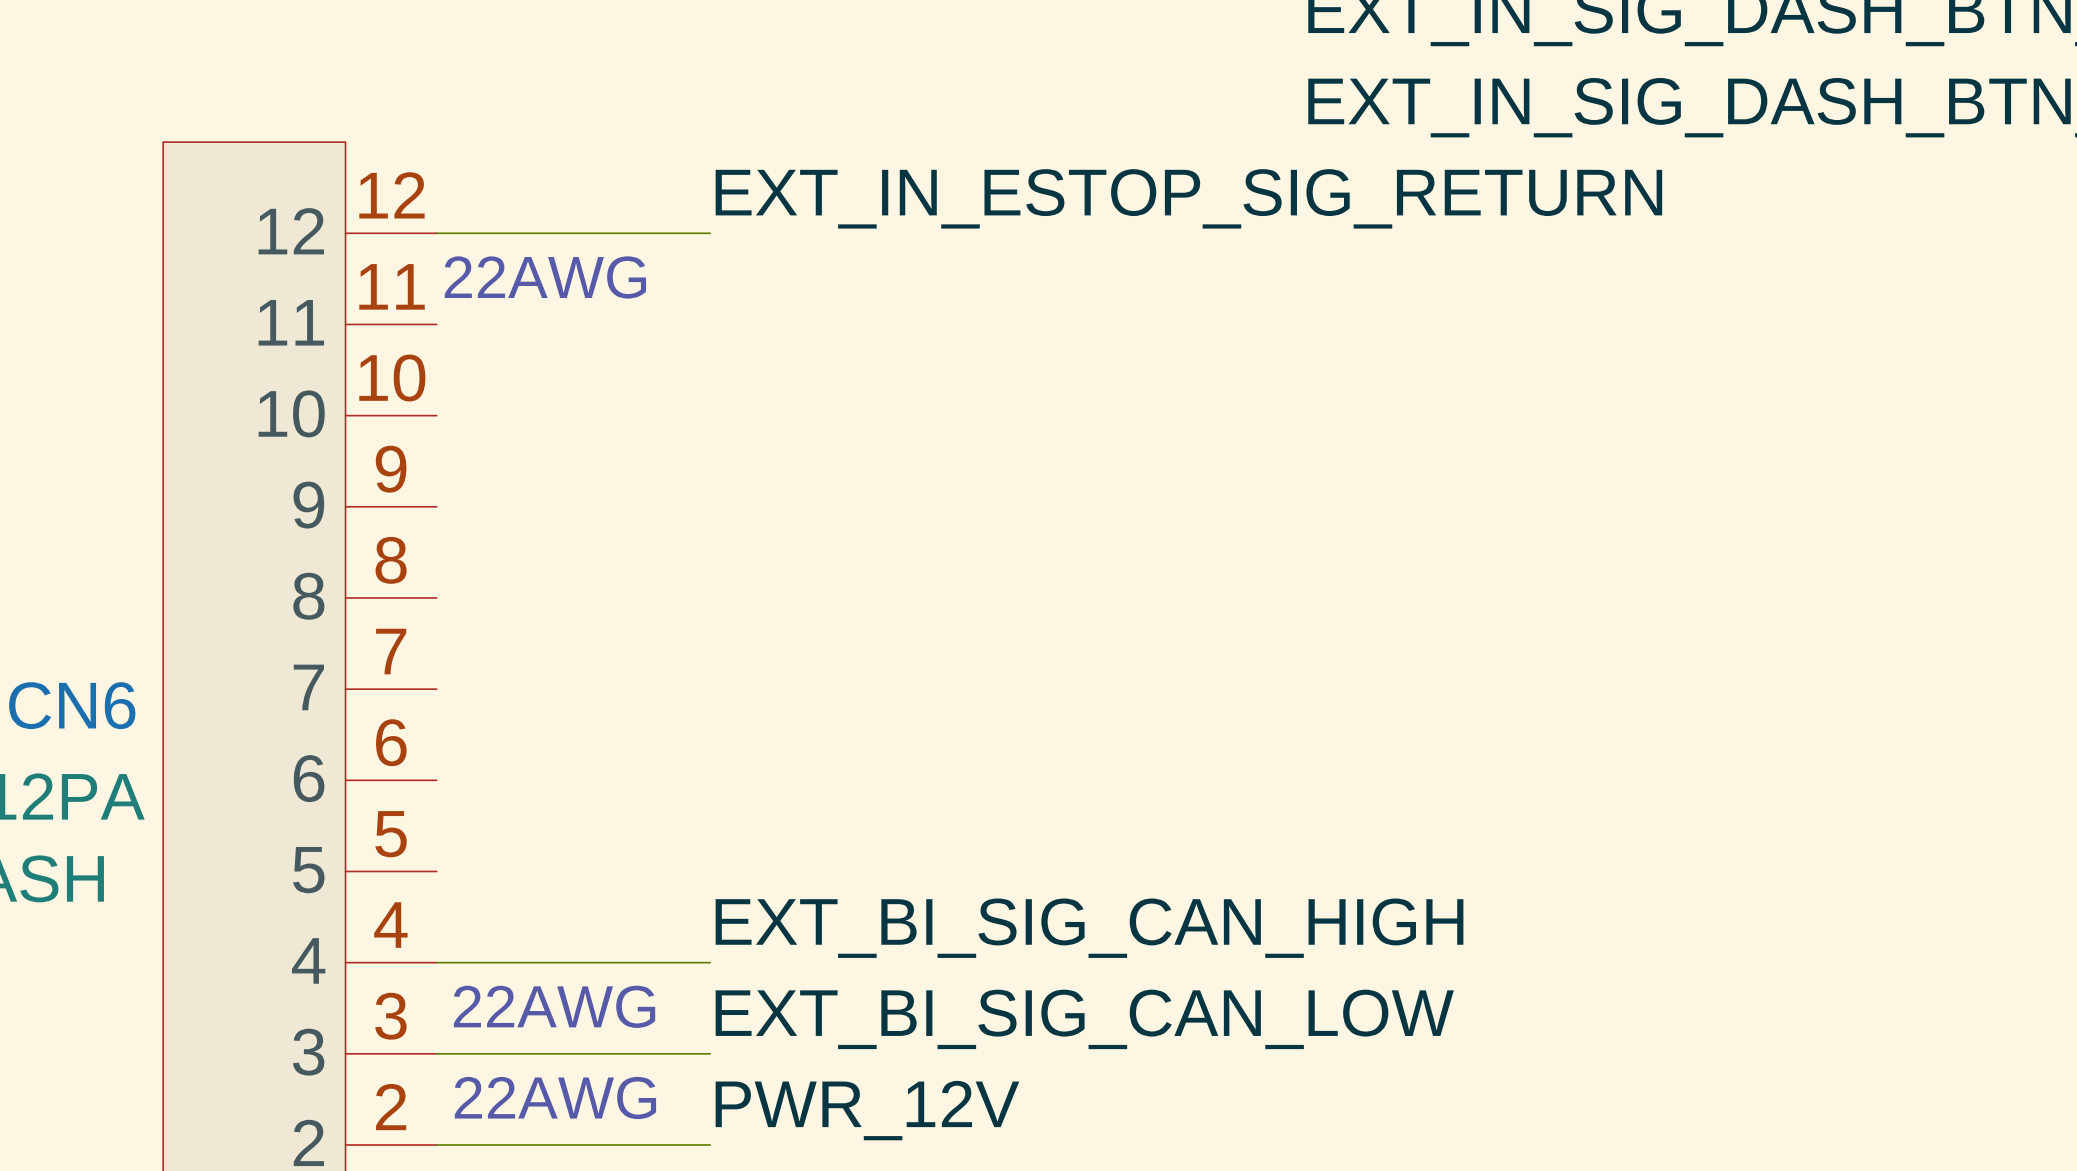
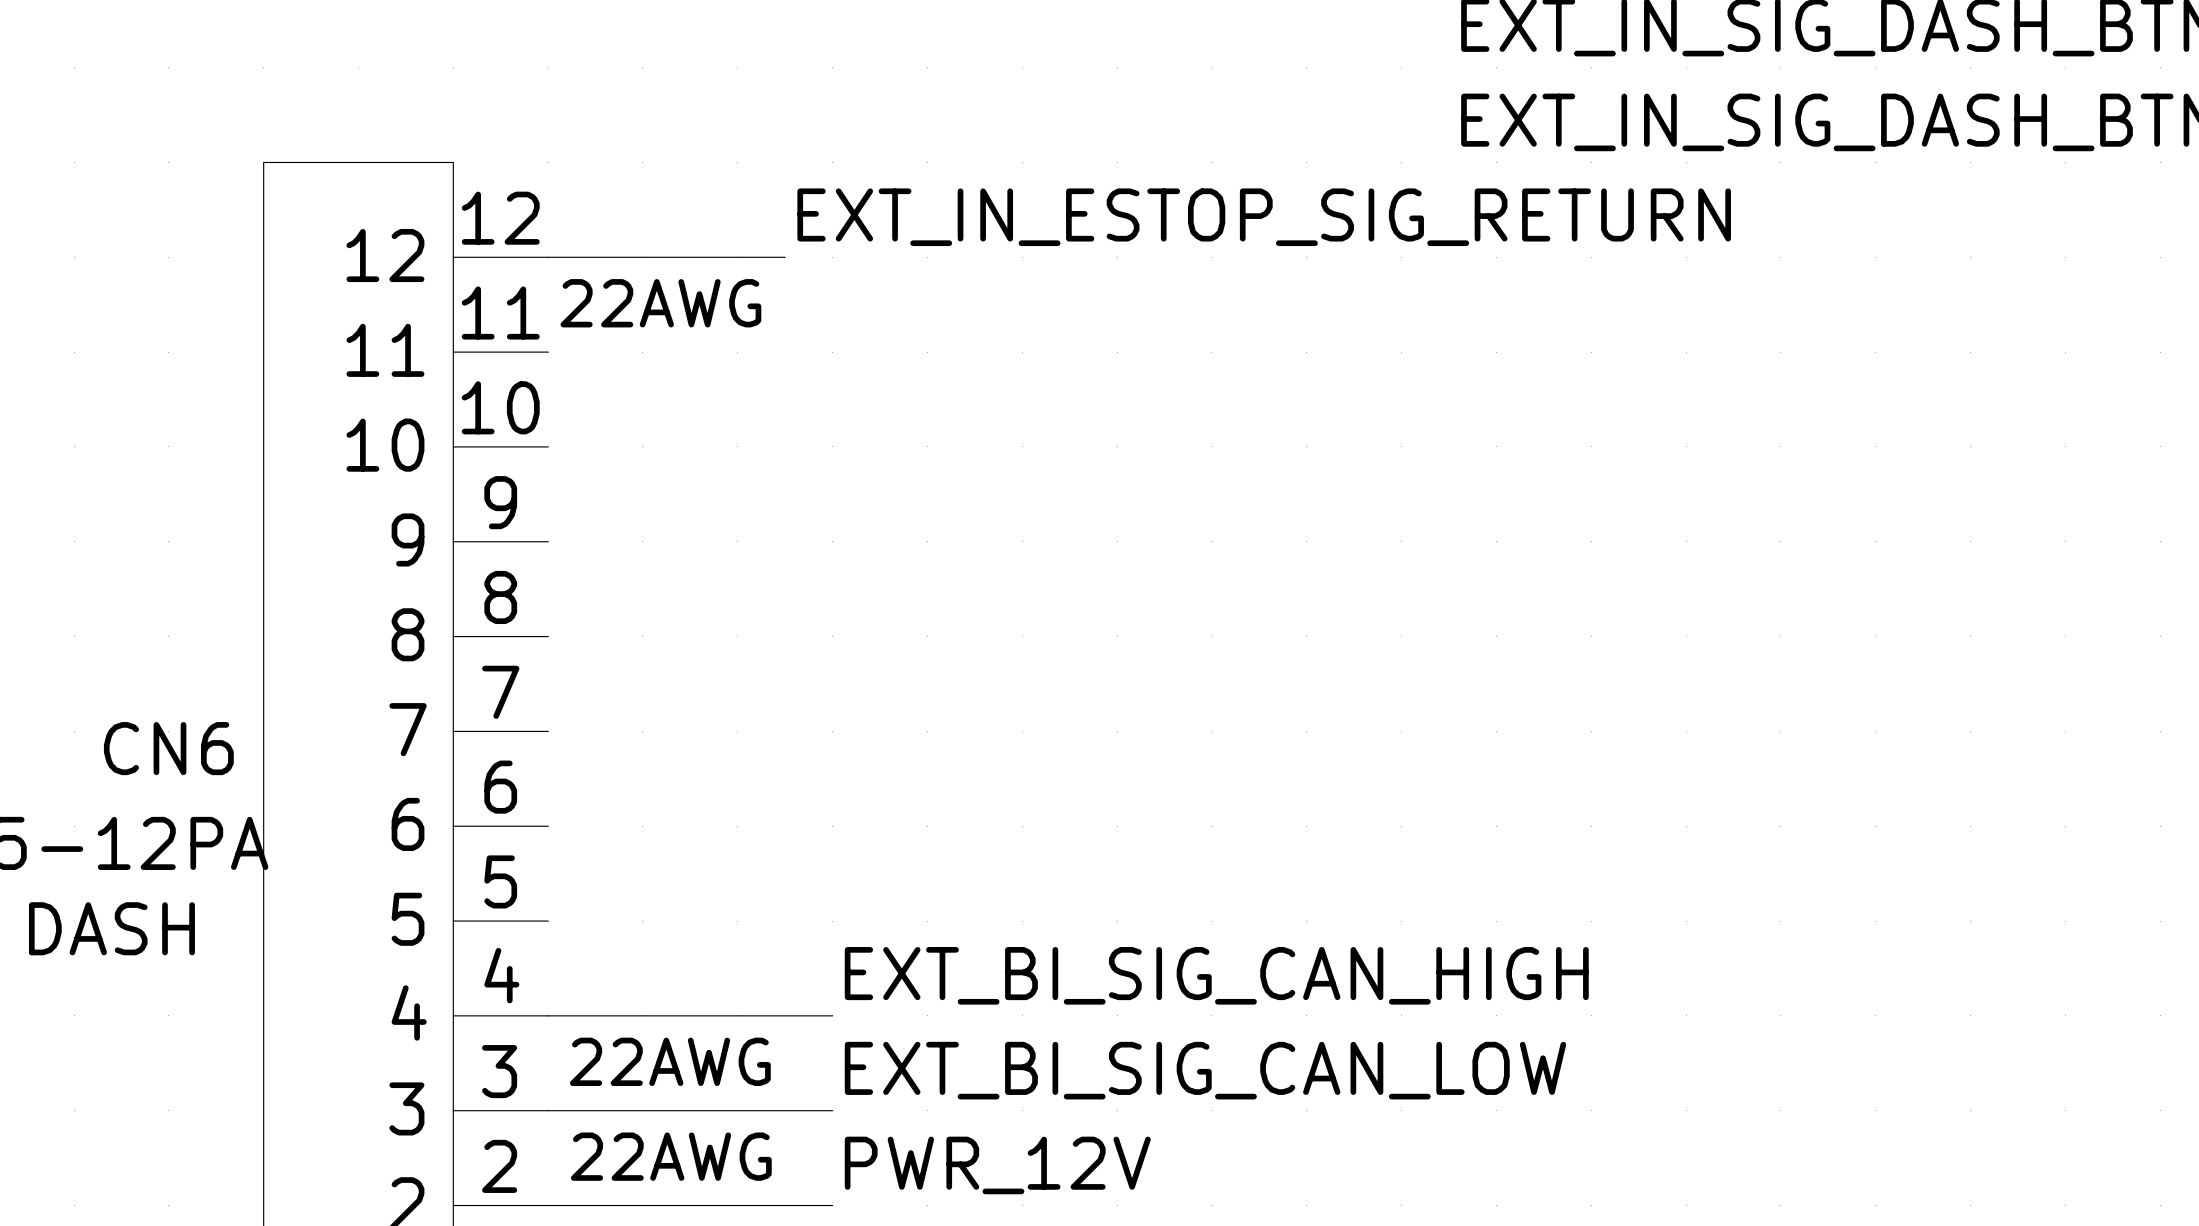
label position: EXT_IN_ESTOP_SIG_RETURN (1188, 198) -> EXT_IN_ESTOP_SIG_RETURN (1264, 217)
wire: (664, 233) (710, 233) -> none

